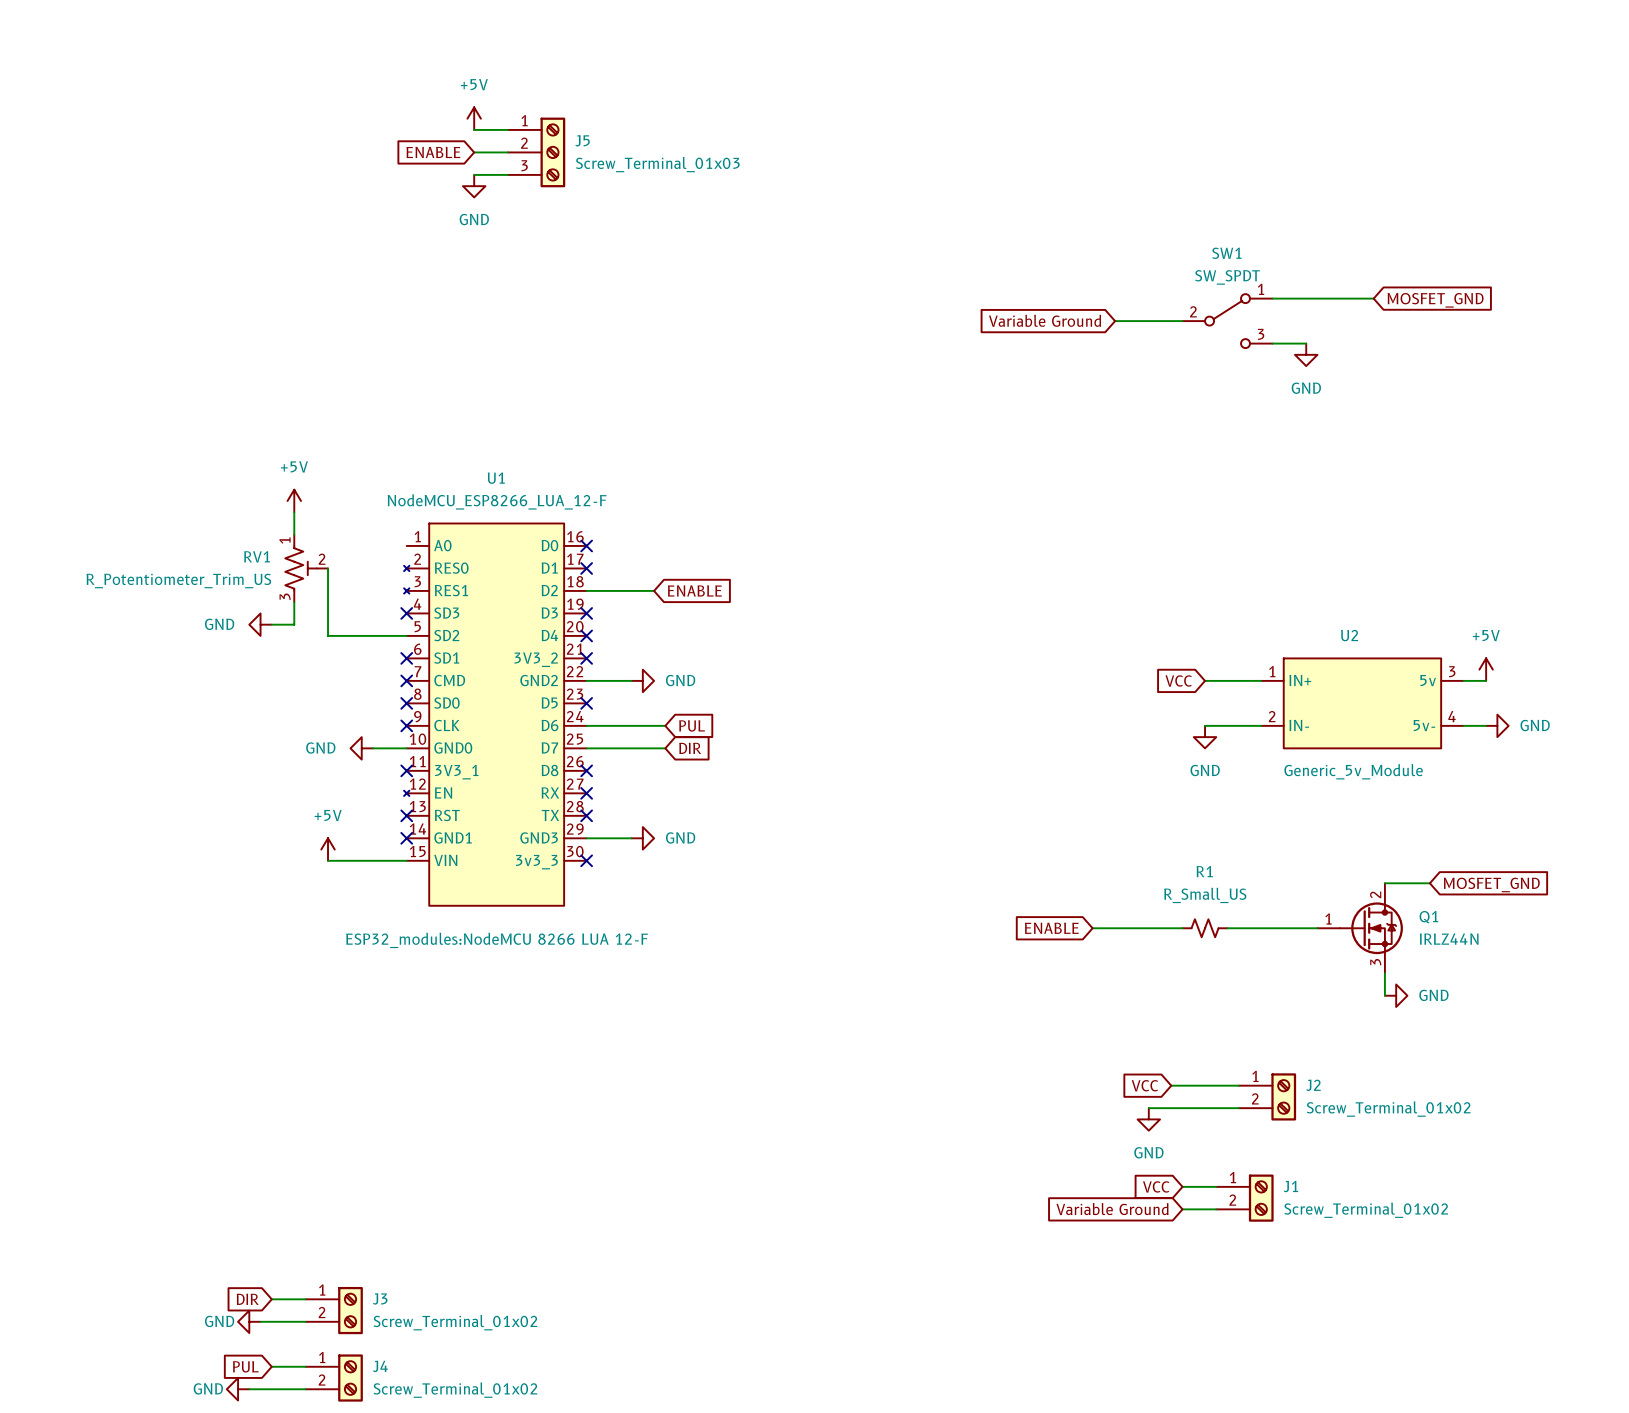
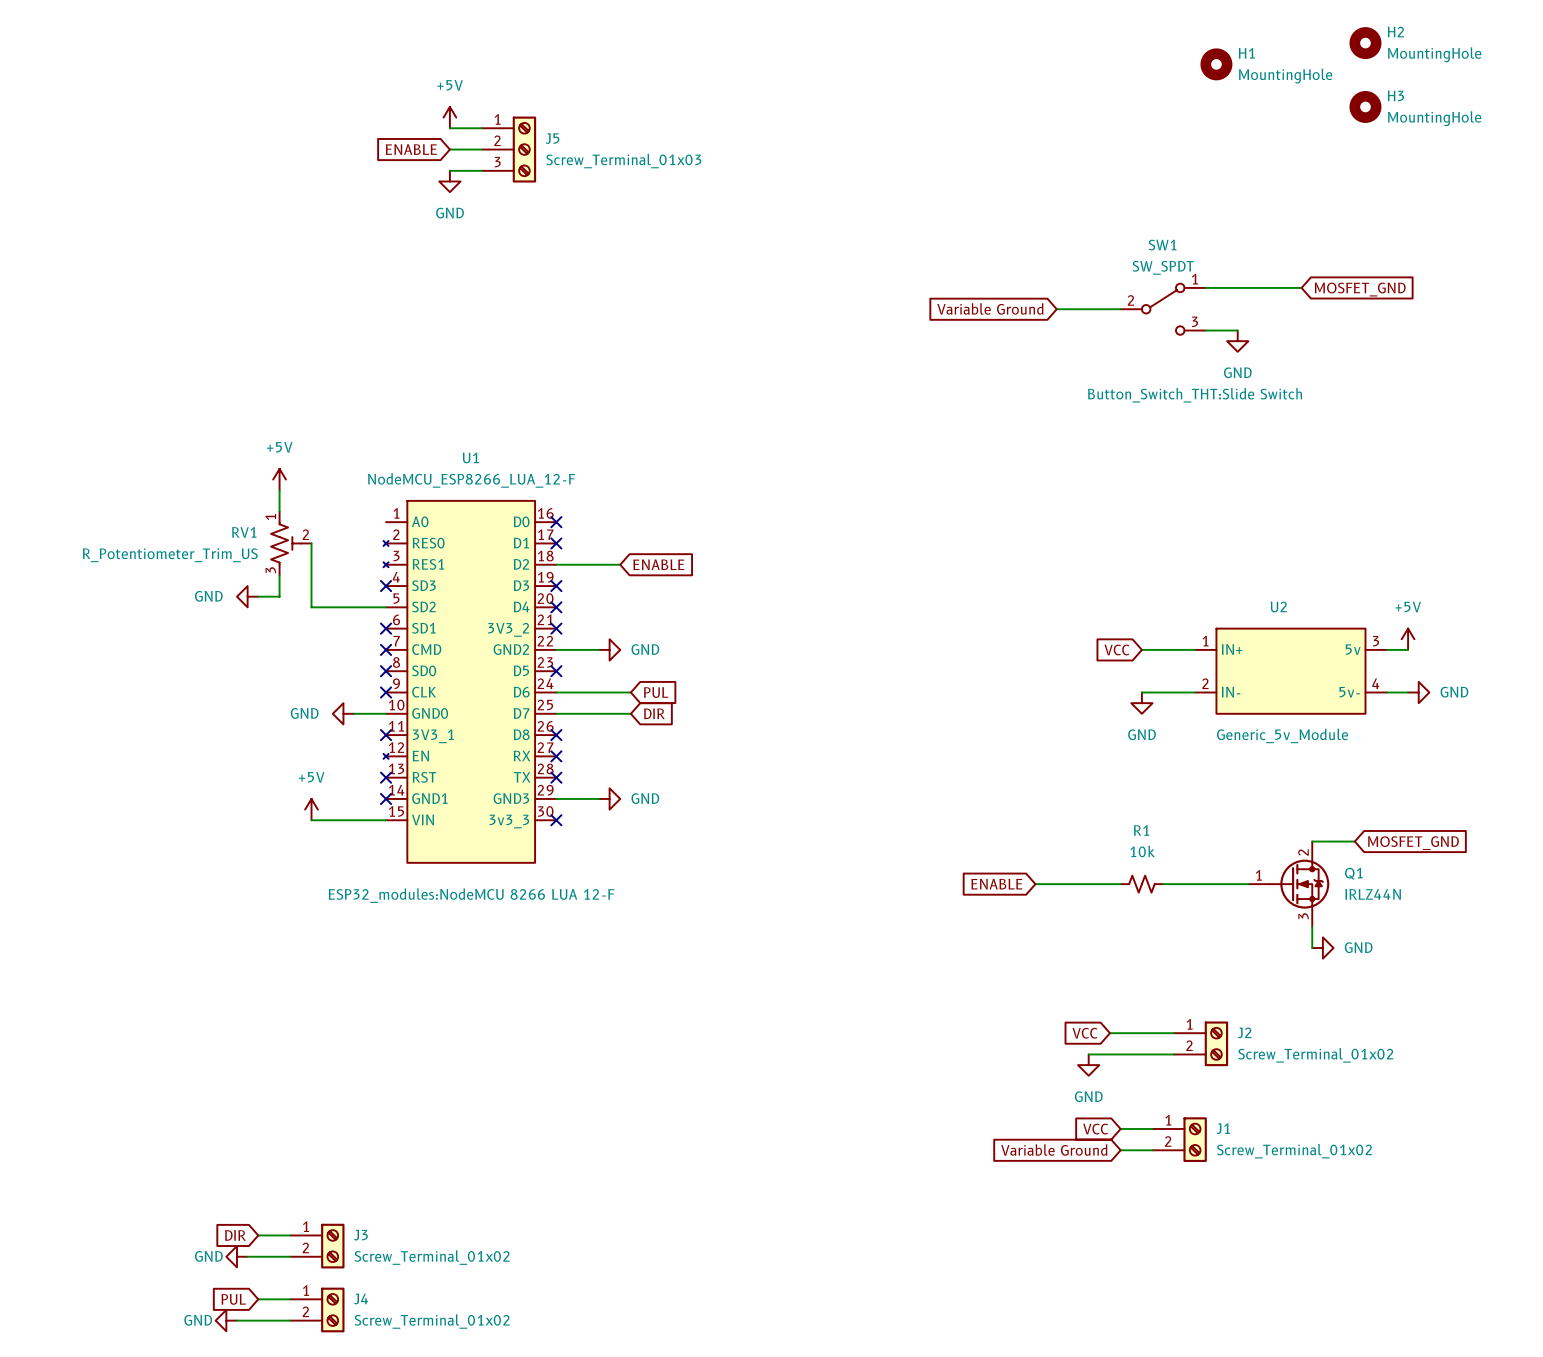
H2: none -> MountingHole (1365, 43)
H1: none -> MountingHole (1216, 64)
H3: none -> MountingHole (1365, 106)
SW1 text: none -> Button_Switch_THT:Slide Switch (1195, 395)
R1 value: R_Small_US (1205, 895) -> 10k (1142, 851)

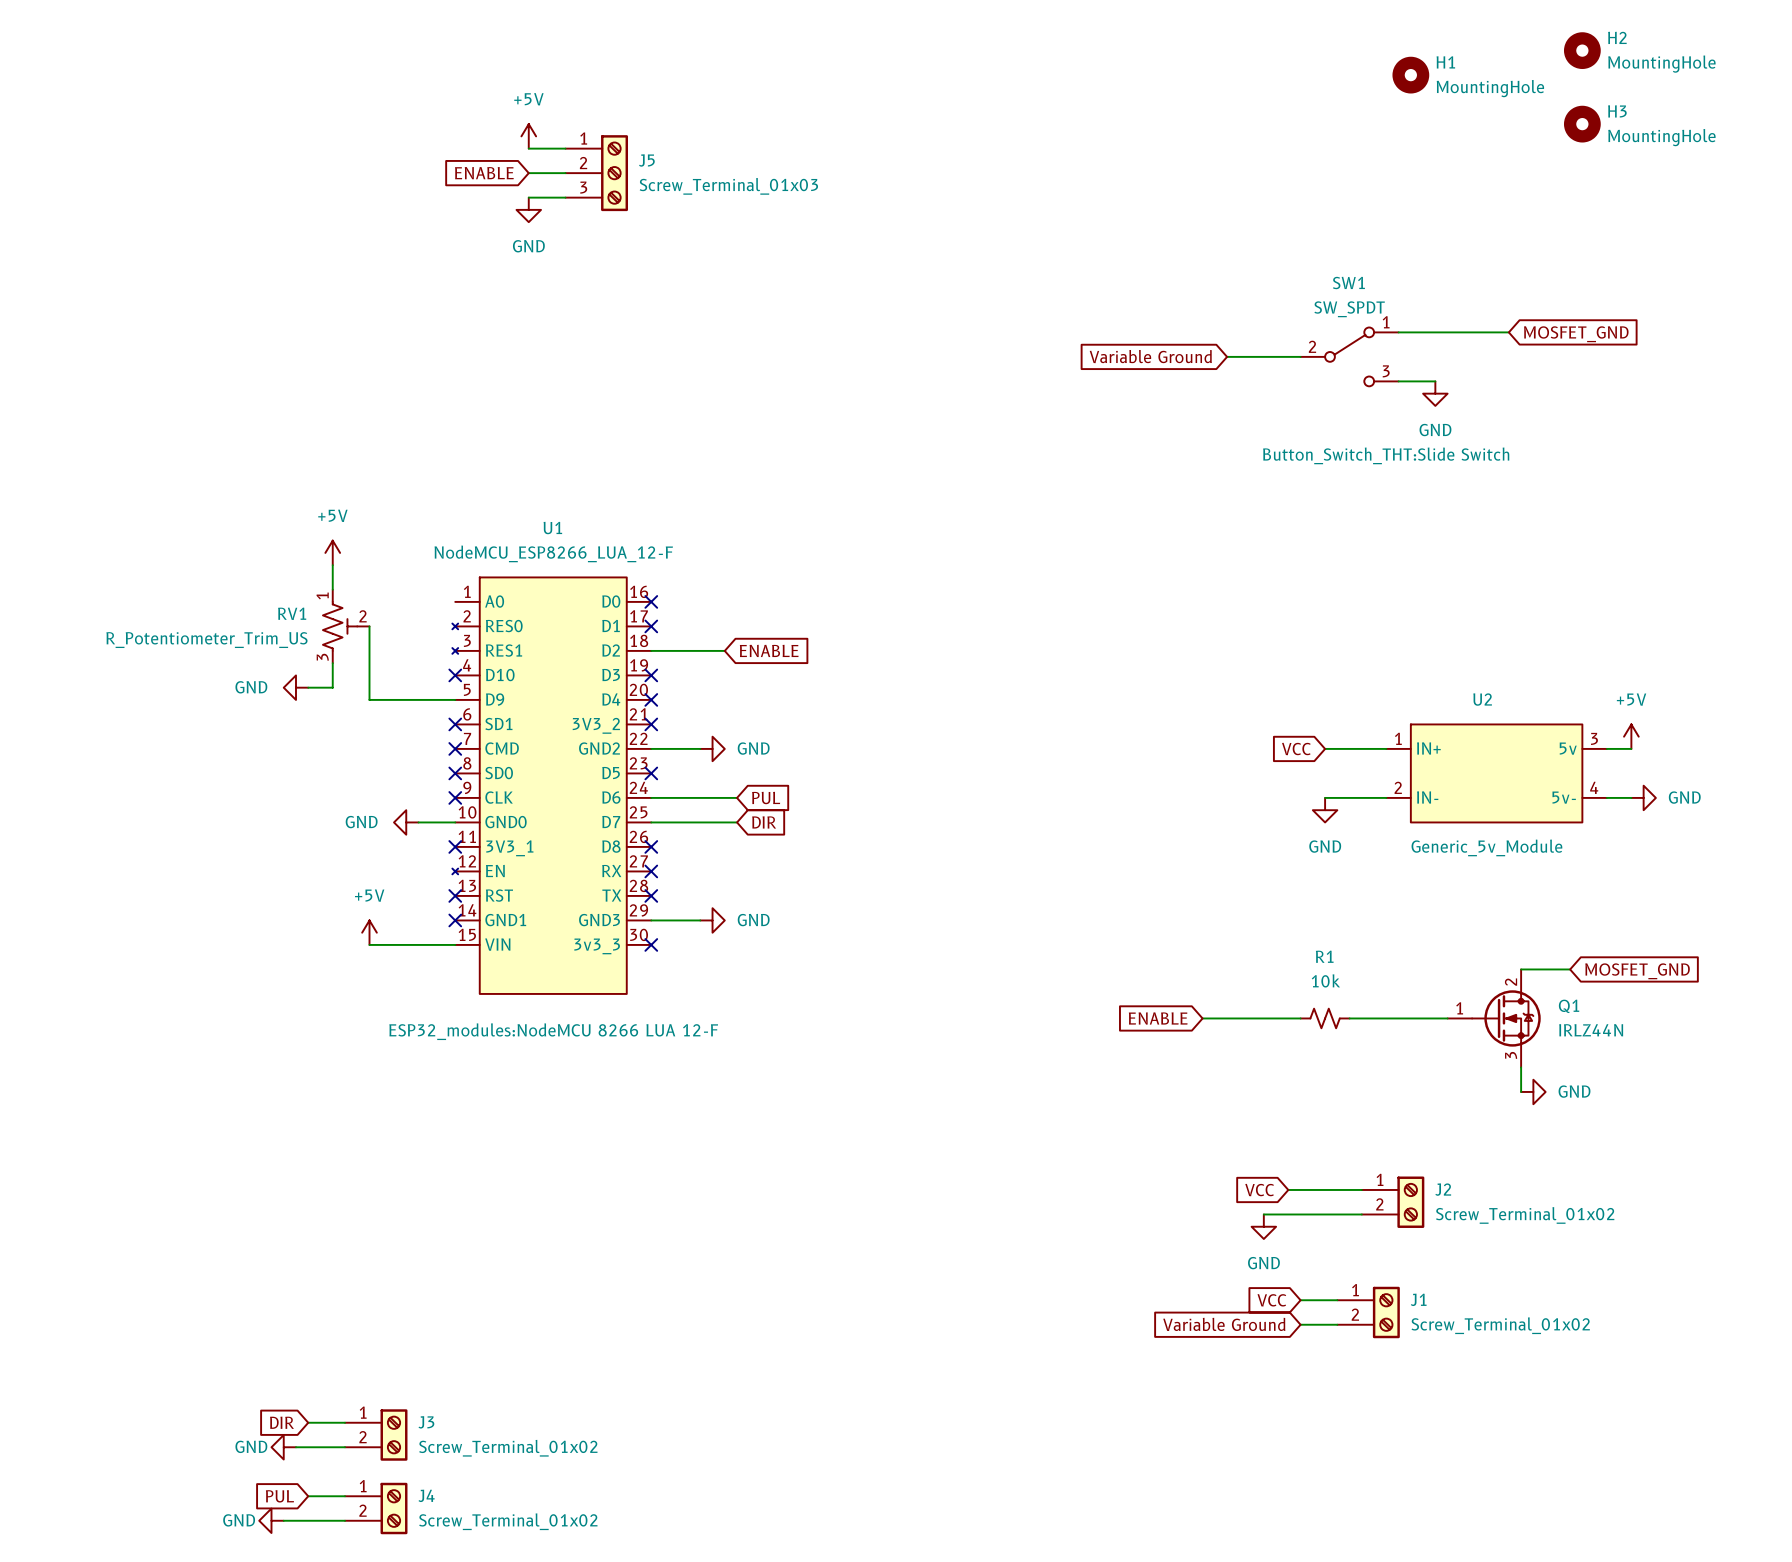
U1 pin name: SD3 (423, 585) -> D10 (500, 675)
U1 pin name: SD2 (423, 607) -> D9 (495, 699)

